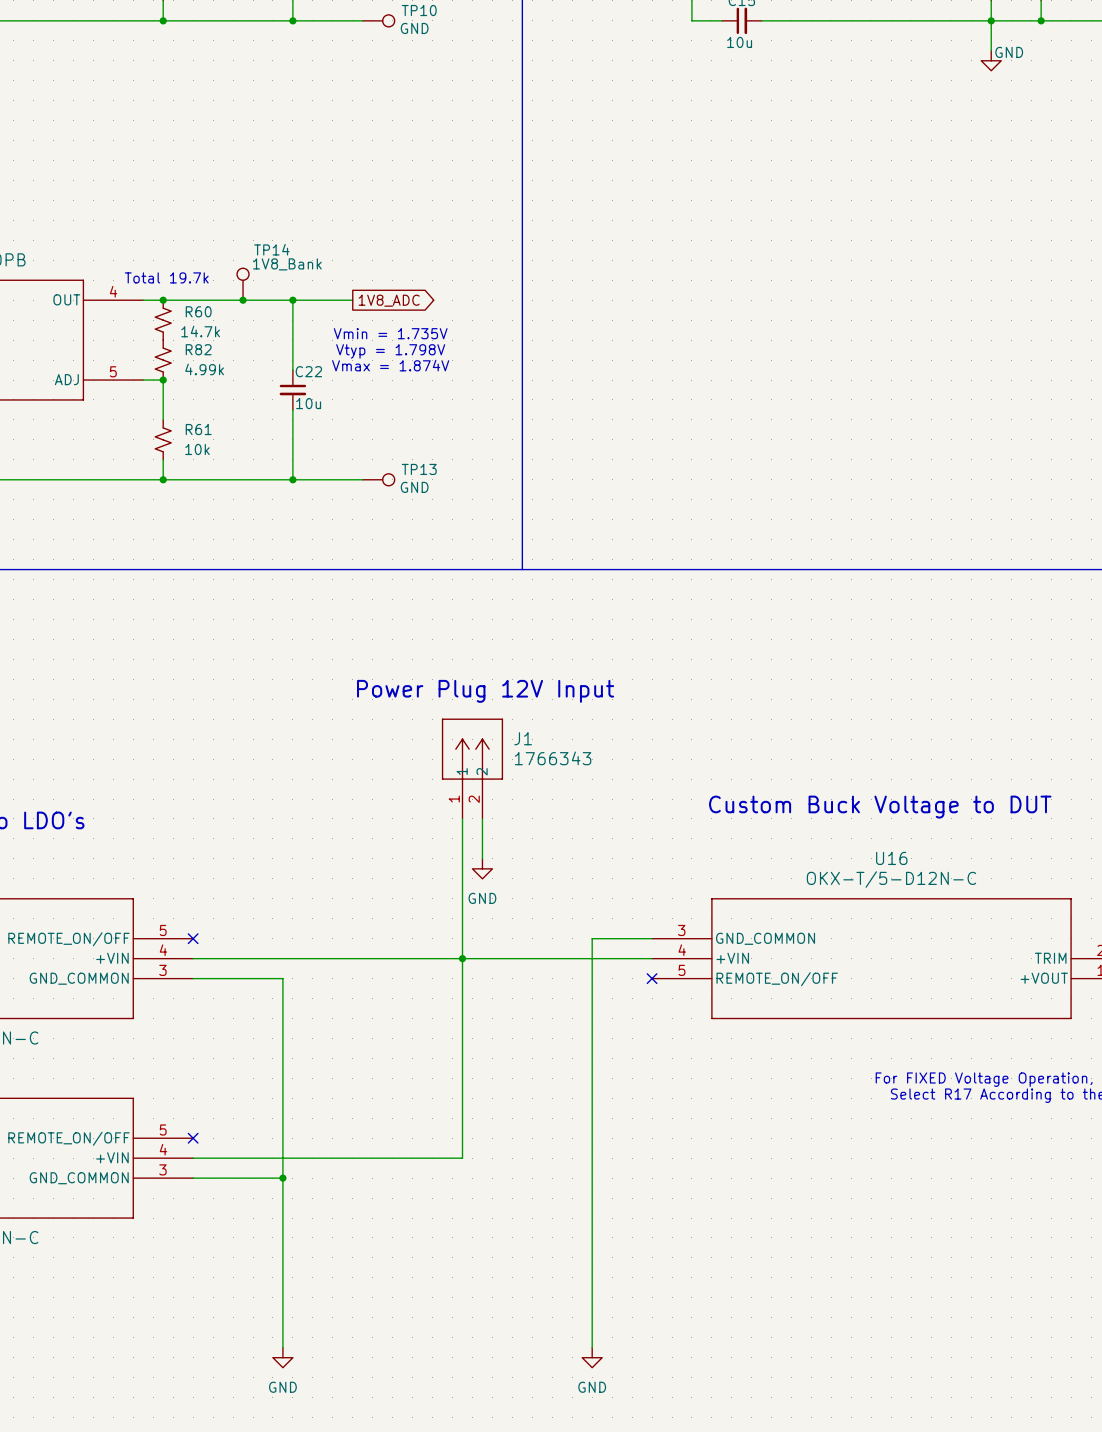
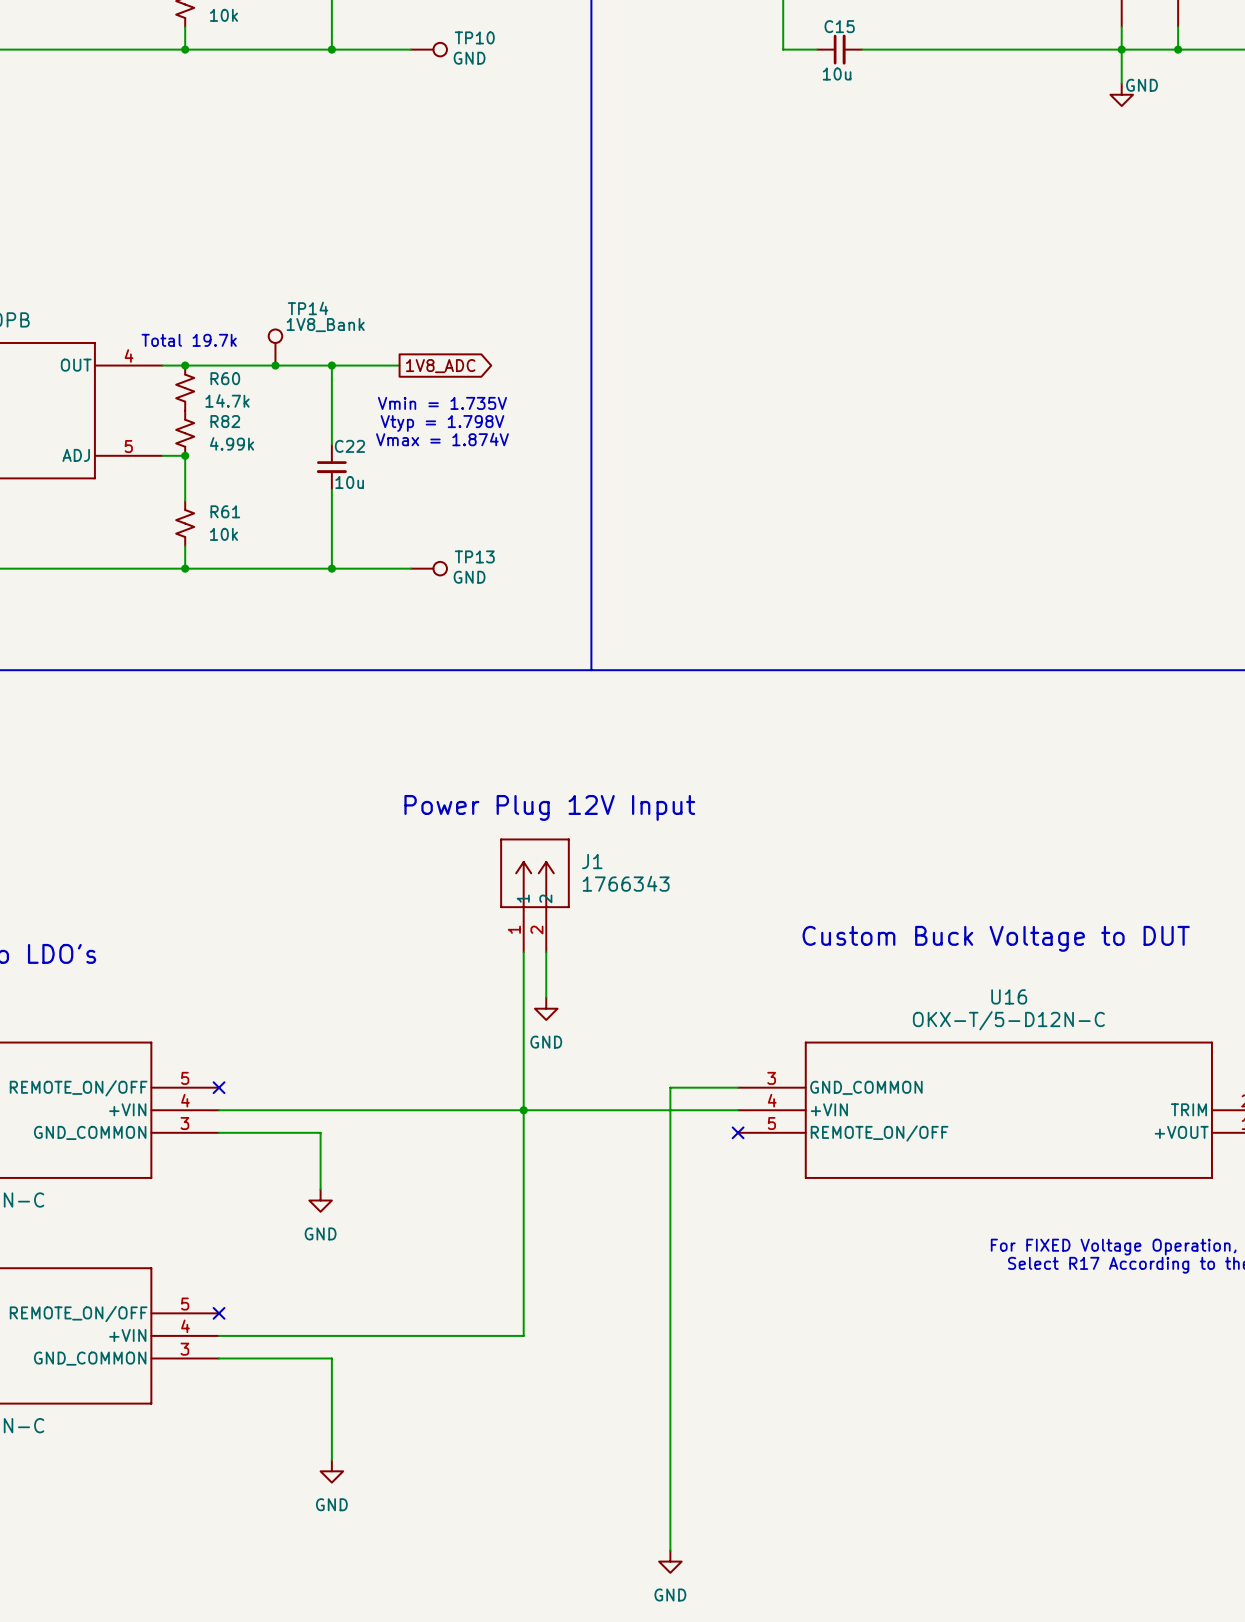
wire: (282, 1028) (282, 1347) -> none
power symbol: none -> GND (320, 1200)
wire: none -> (320, 1358) (331, 1358) (331, 1460)
junction: (282, 1178) -> none
power symbol position: GND (282, 1357) -> GND (331, 1471)

